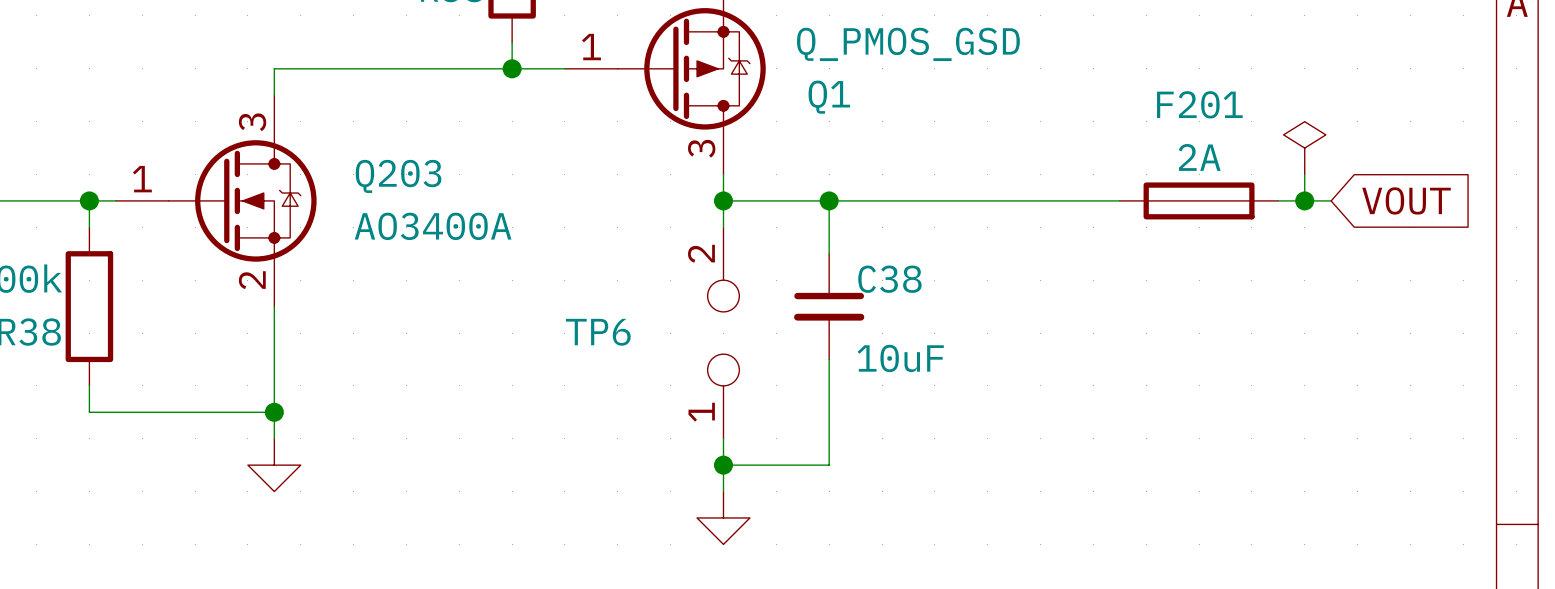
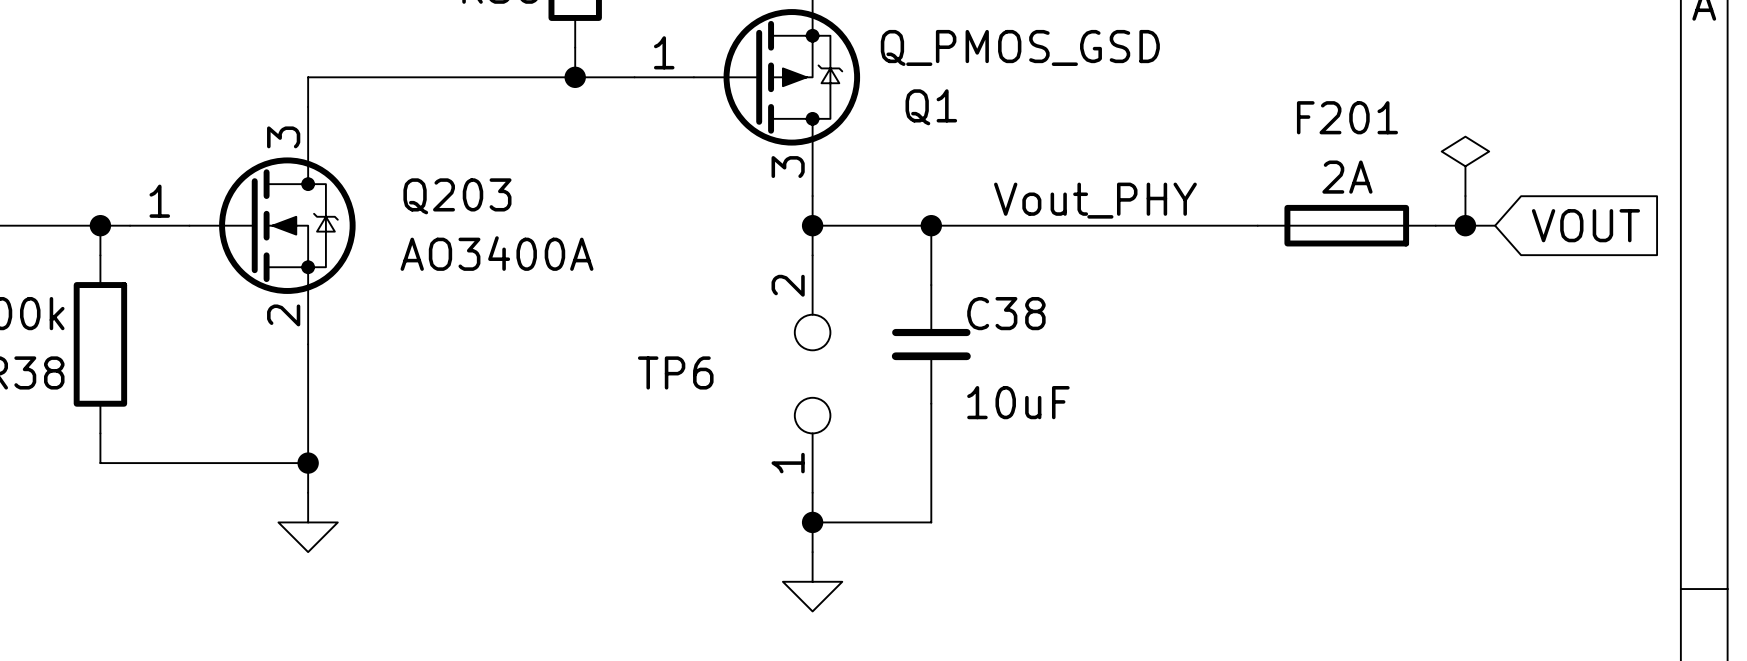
label: none -> Vout_PHY (1095, 200)

